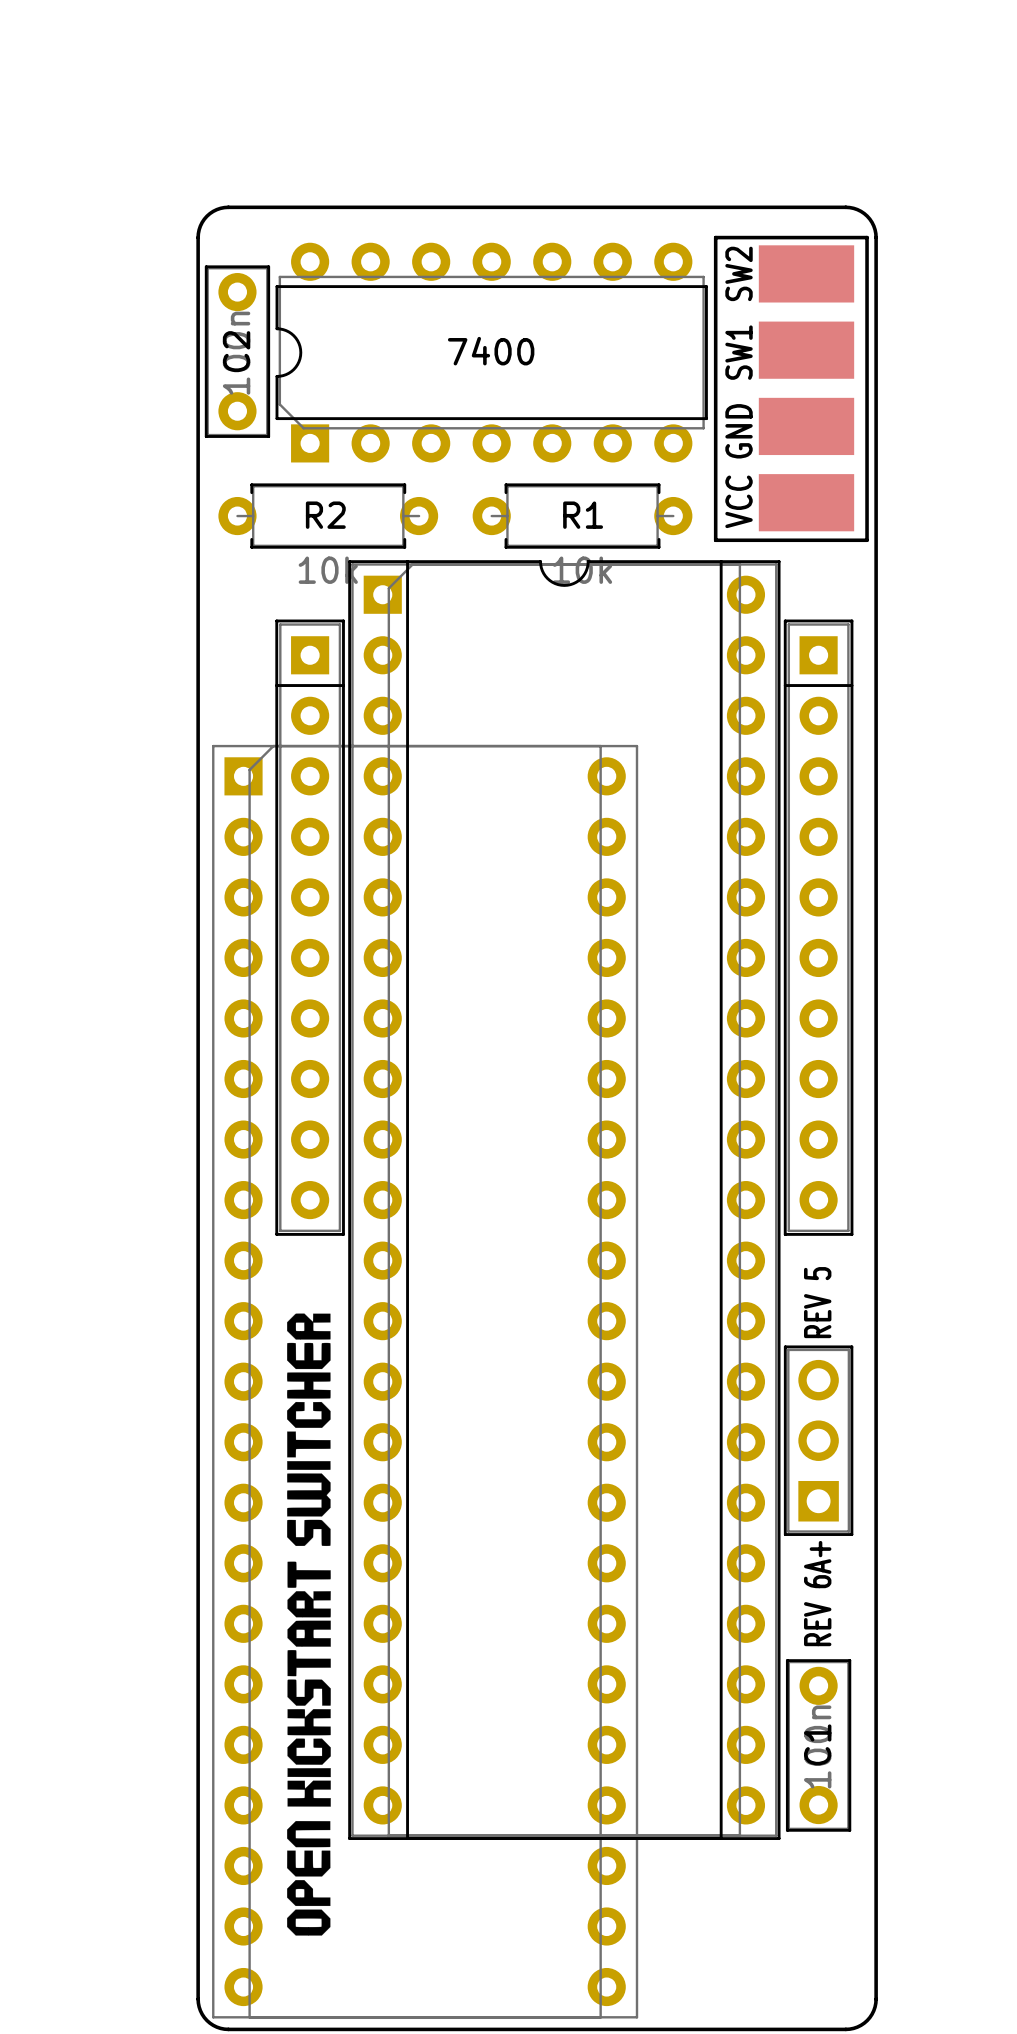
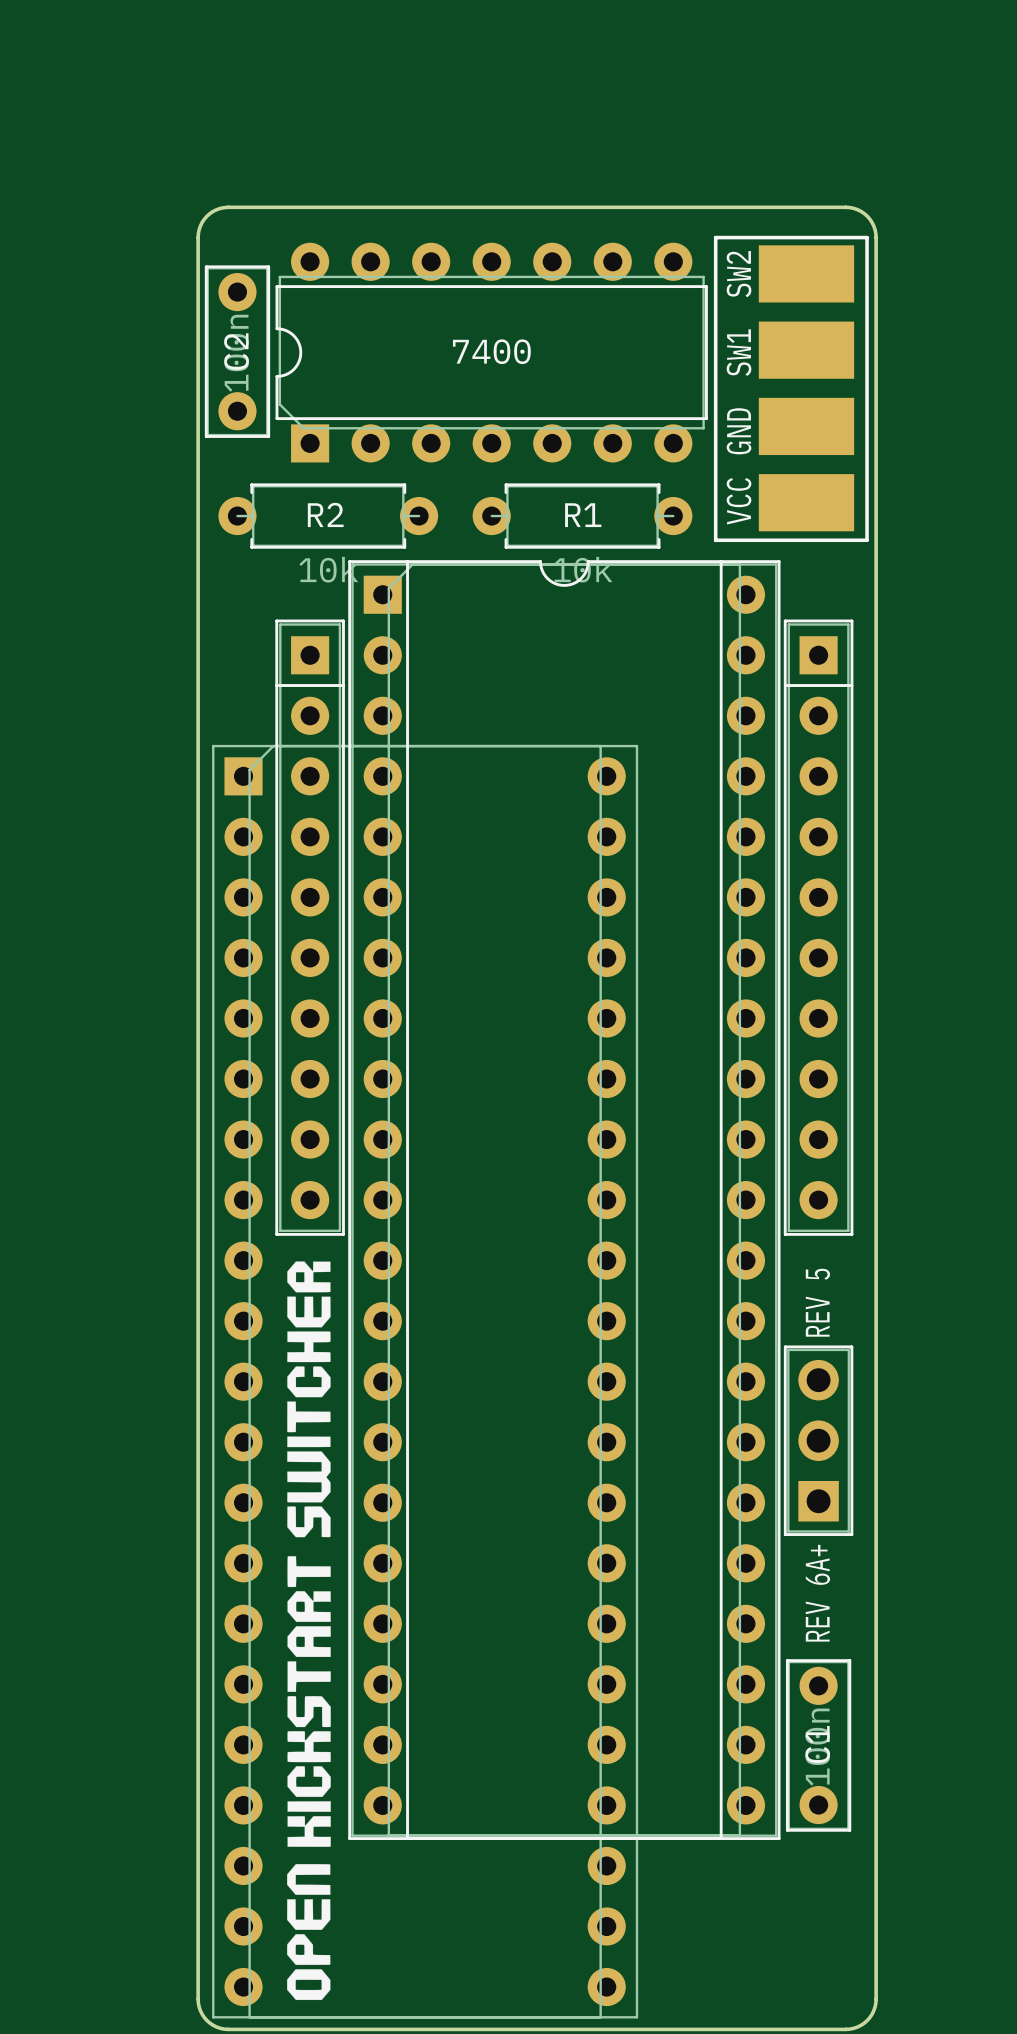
drawing shape: [287, 1313, 331, 1936] -> [287, 1261, 331, 2001]

